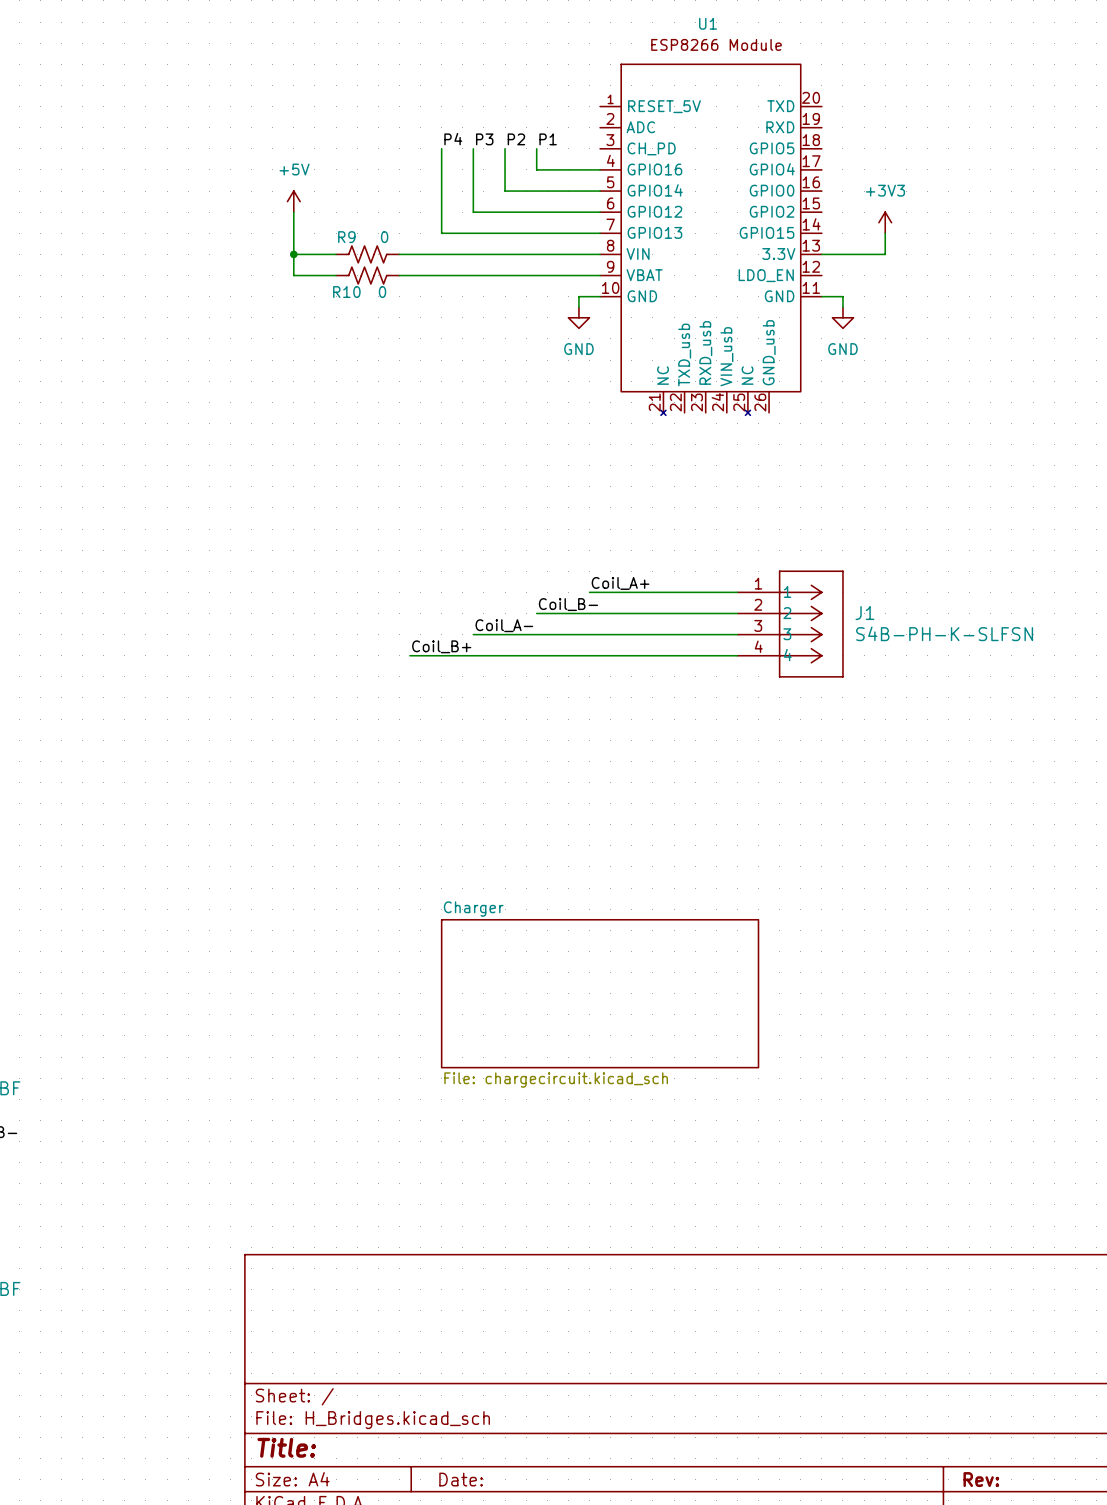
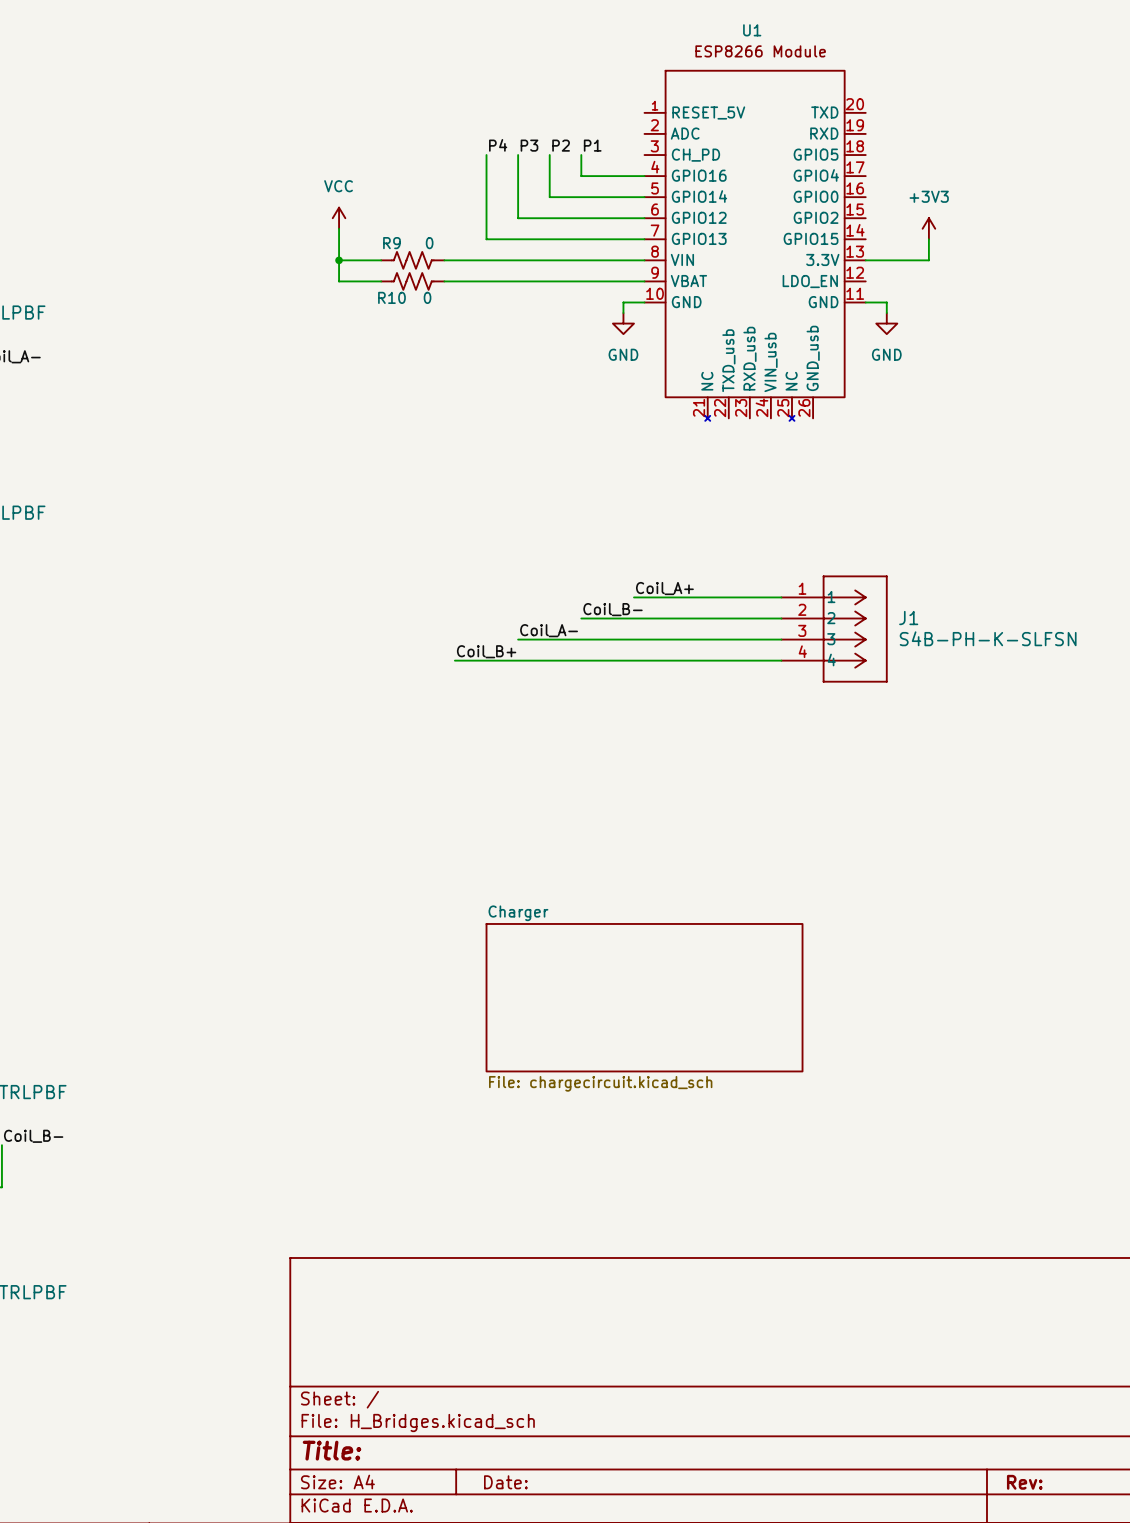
power symbol: +5V (293, 201) -> none
power symbol: none -> VCC (339, 218)

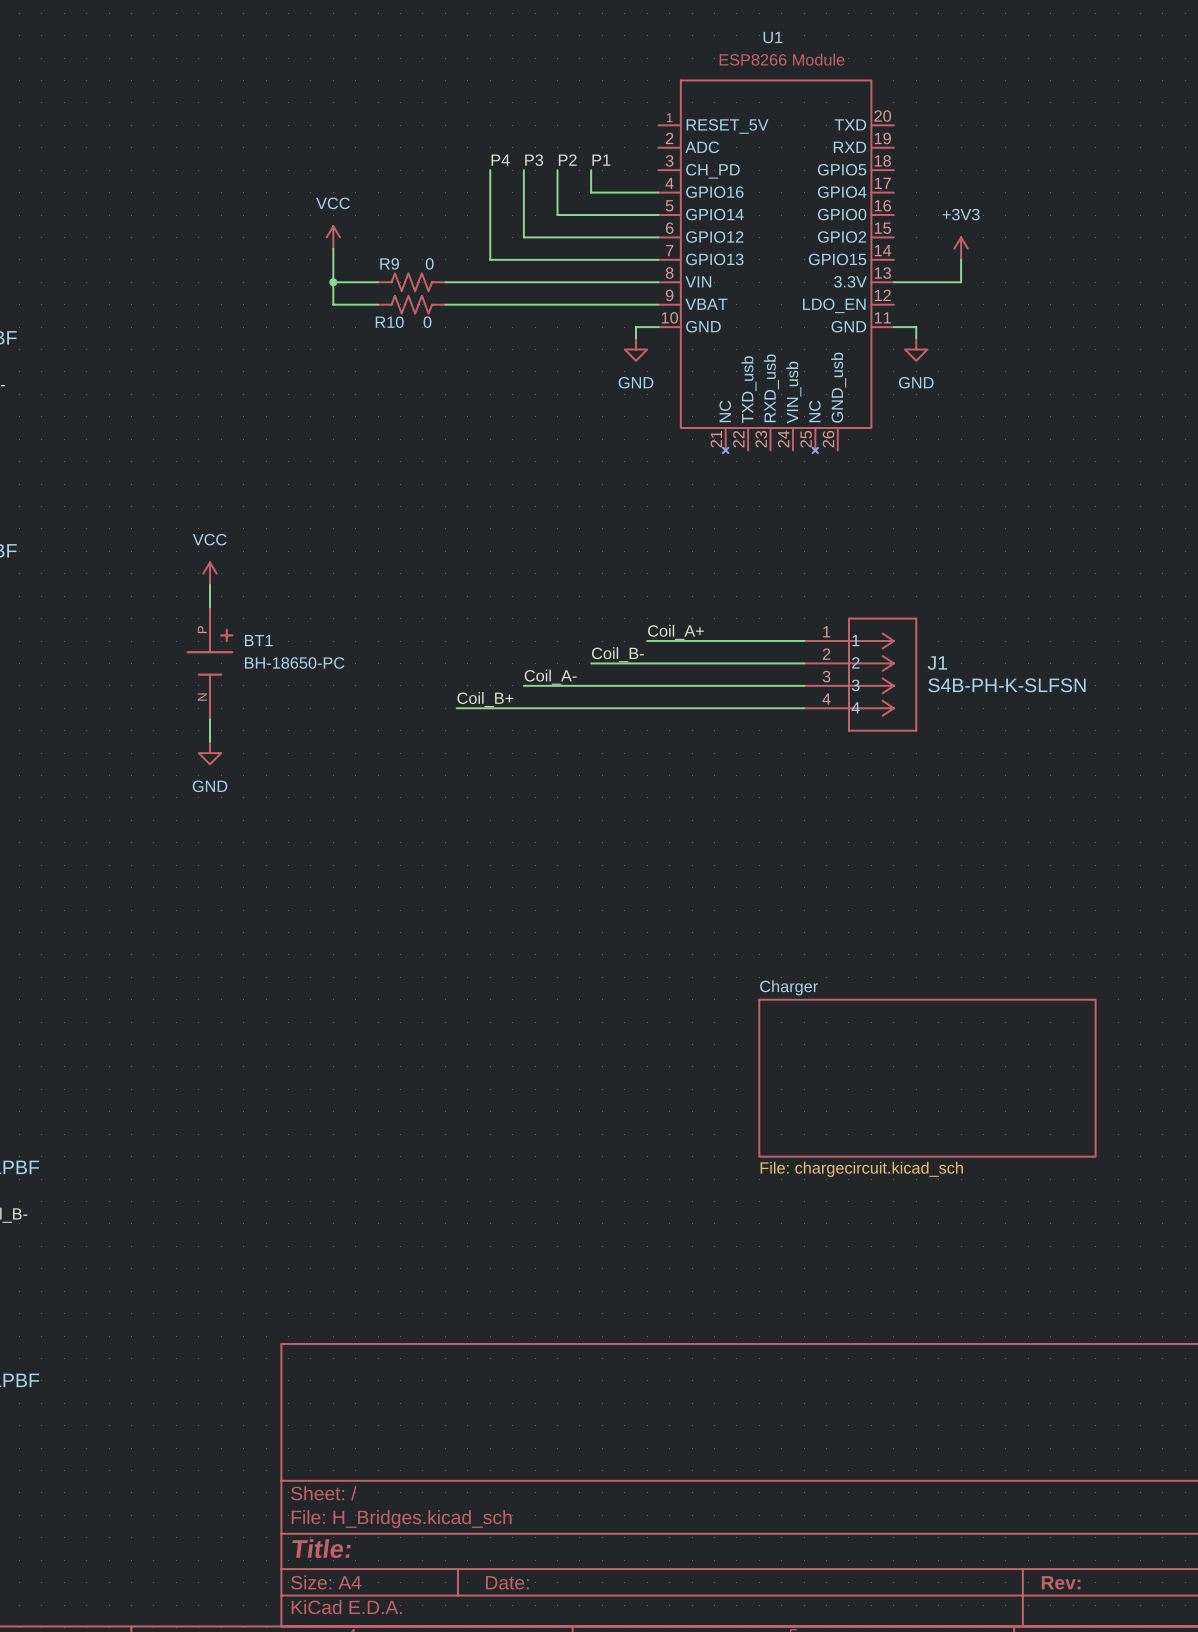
power symbol: none -> VCC (209, 573)
wire: none -> (209, 584) (209, 607)
BT1: none -> BH-18650-PC (209, 663)
wire: none -> (209, 719) (209, 741)
power symbol: none -> GND (209, 753)
sheet Charger: File: chargecircuit.kicad_sch (644, 997) -> none
sheet Charger: none -> File: chargecircuit.kicad_sch (927, 1078)

